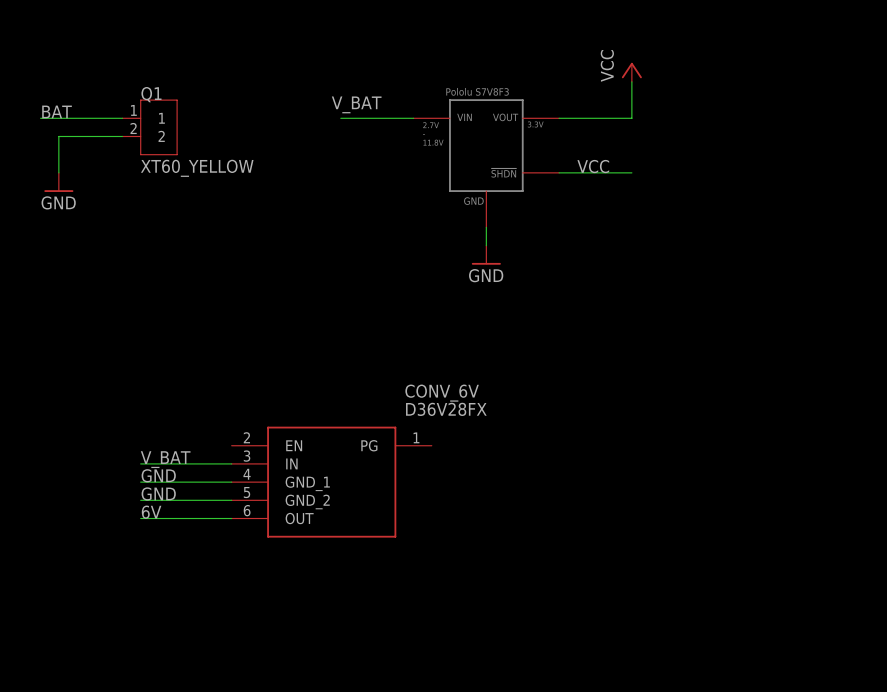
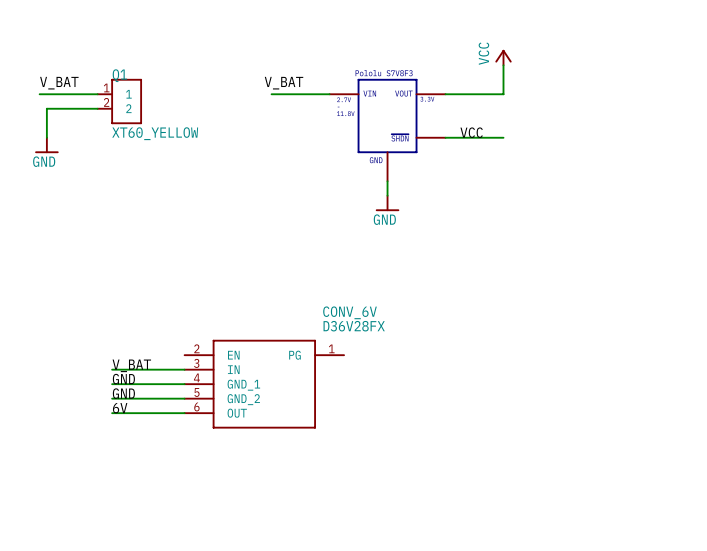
label: BAT (57, 111) -> V_BAT (59, 83)
wire: (40, 118) (49, 118) -> none

